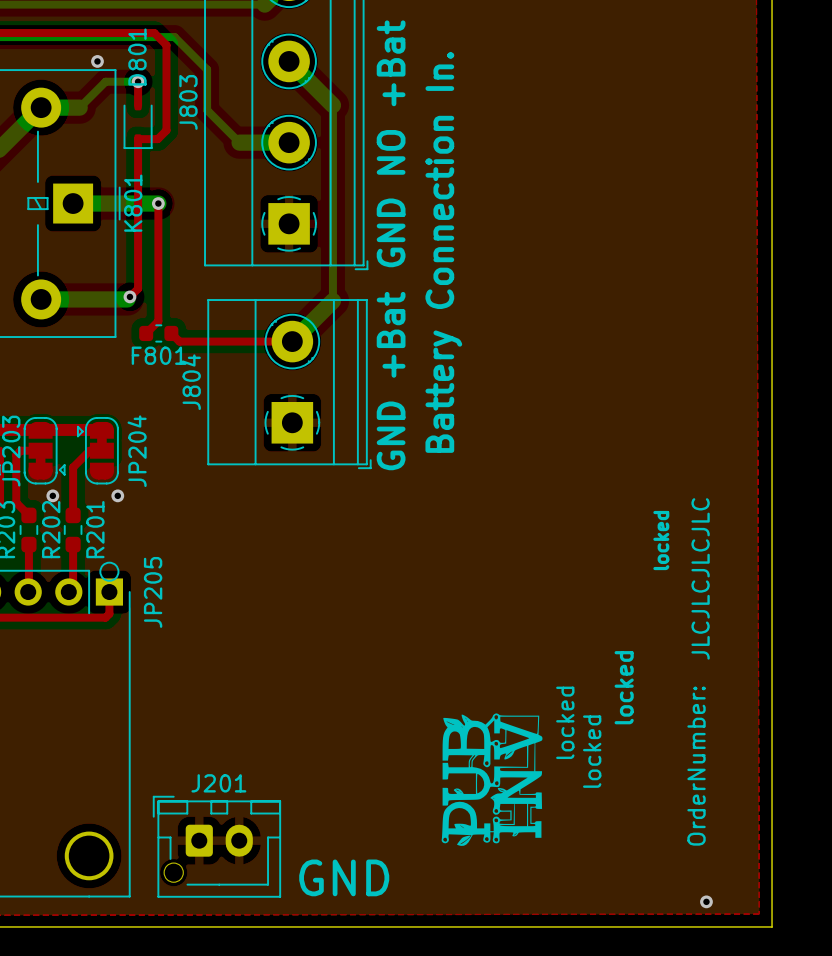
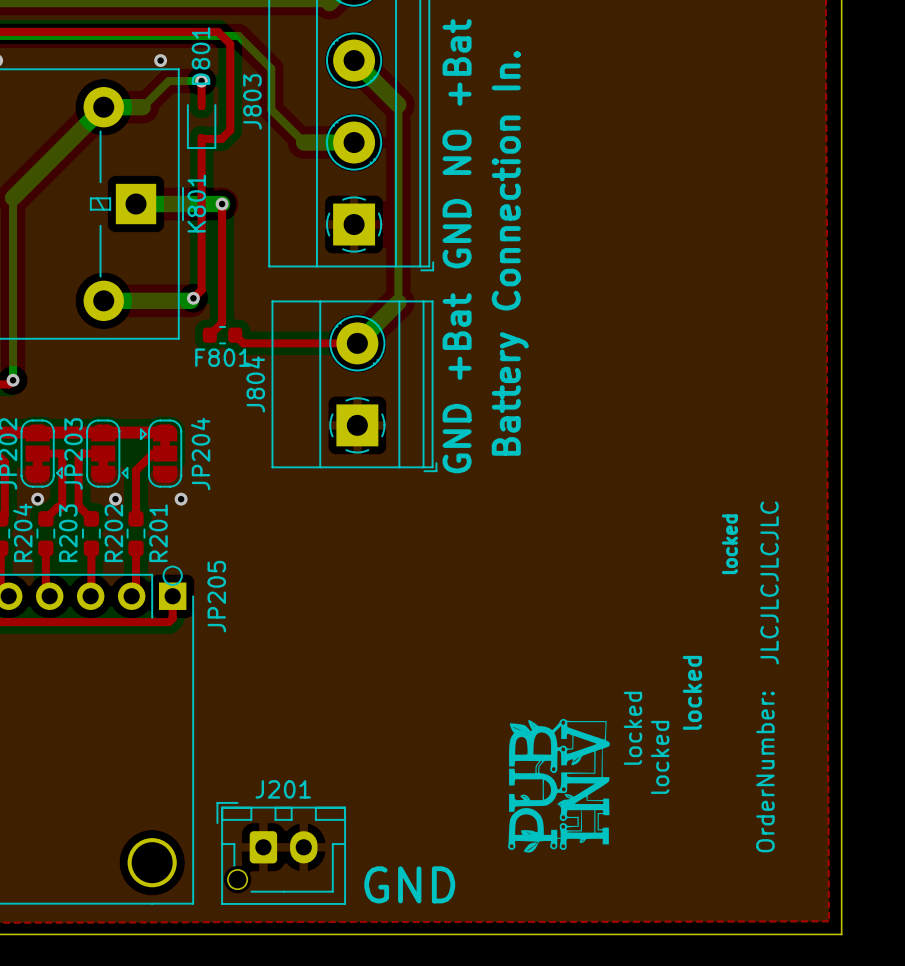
via: (706, 901) -> none

